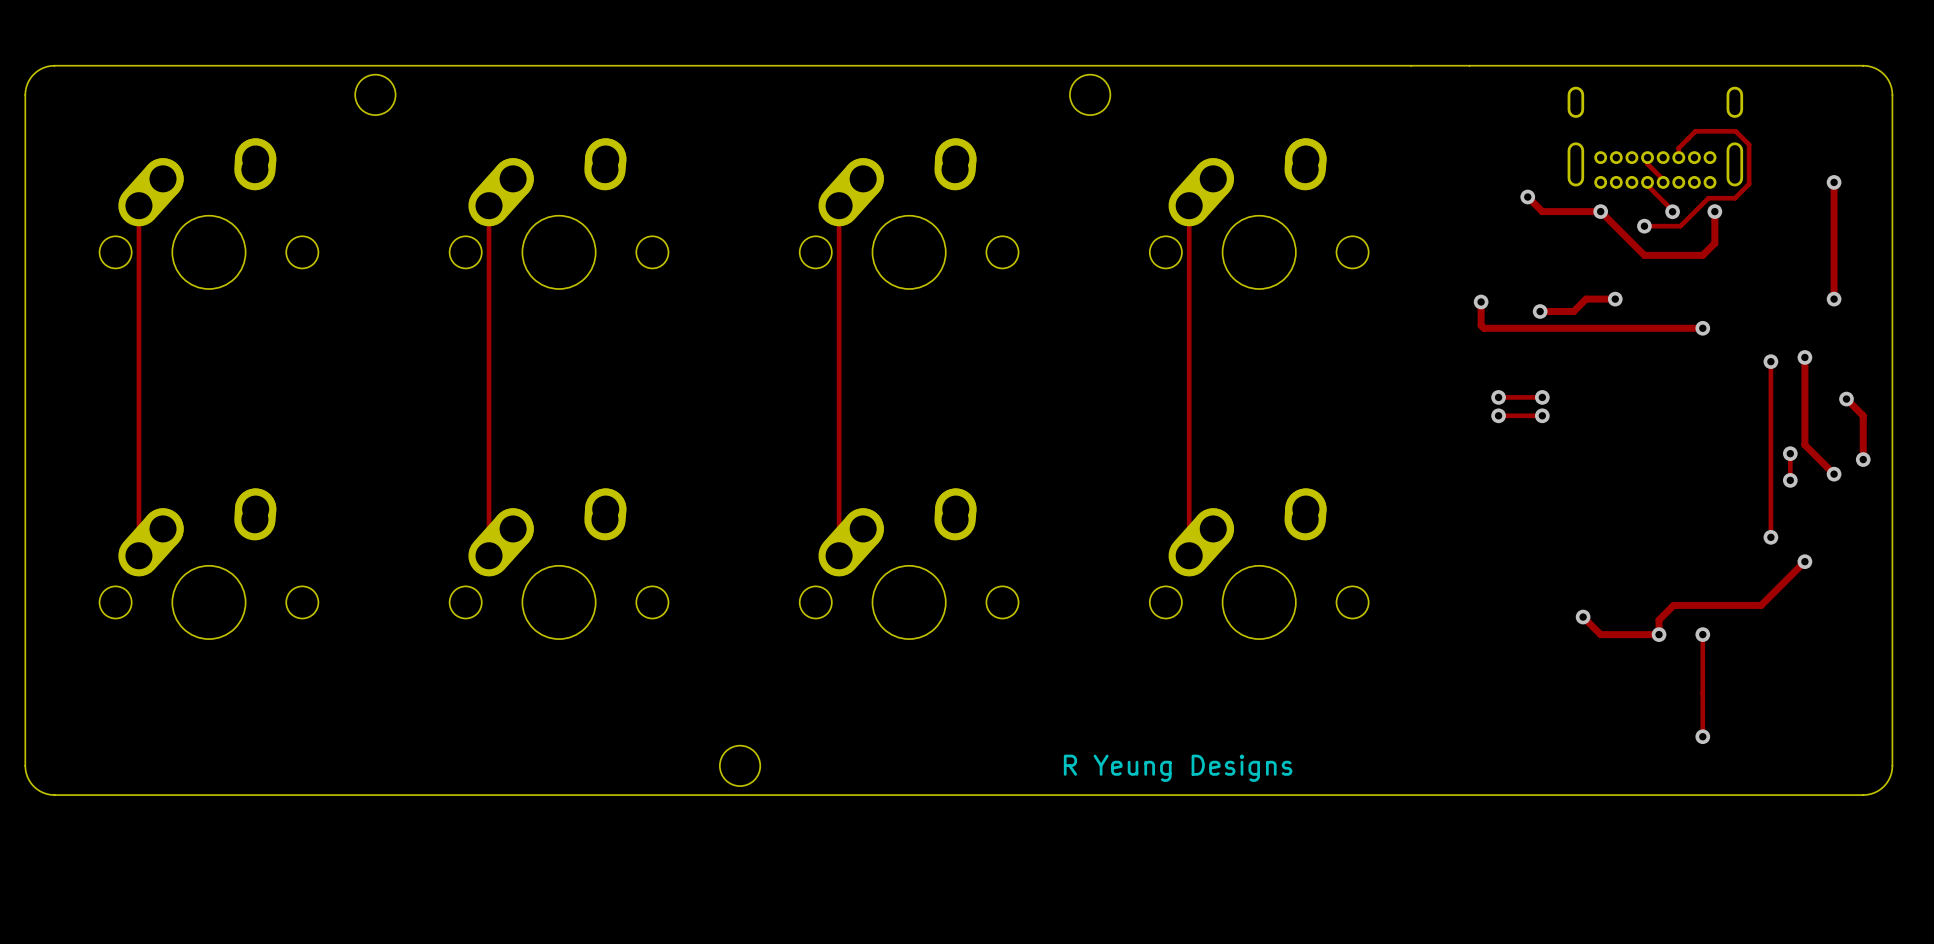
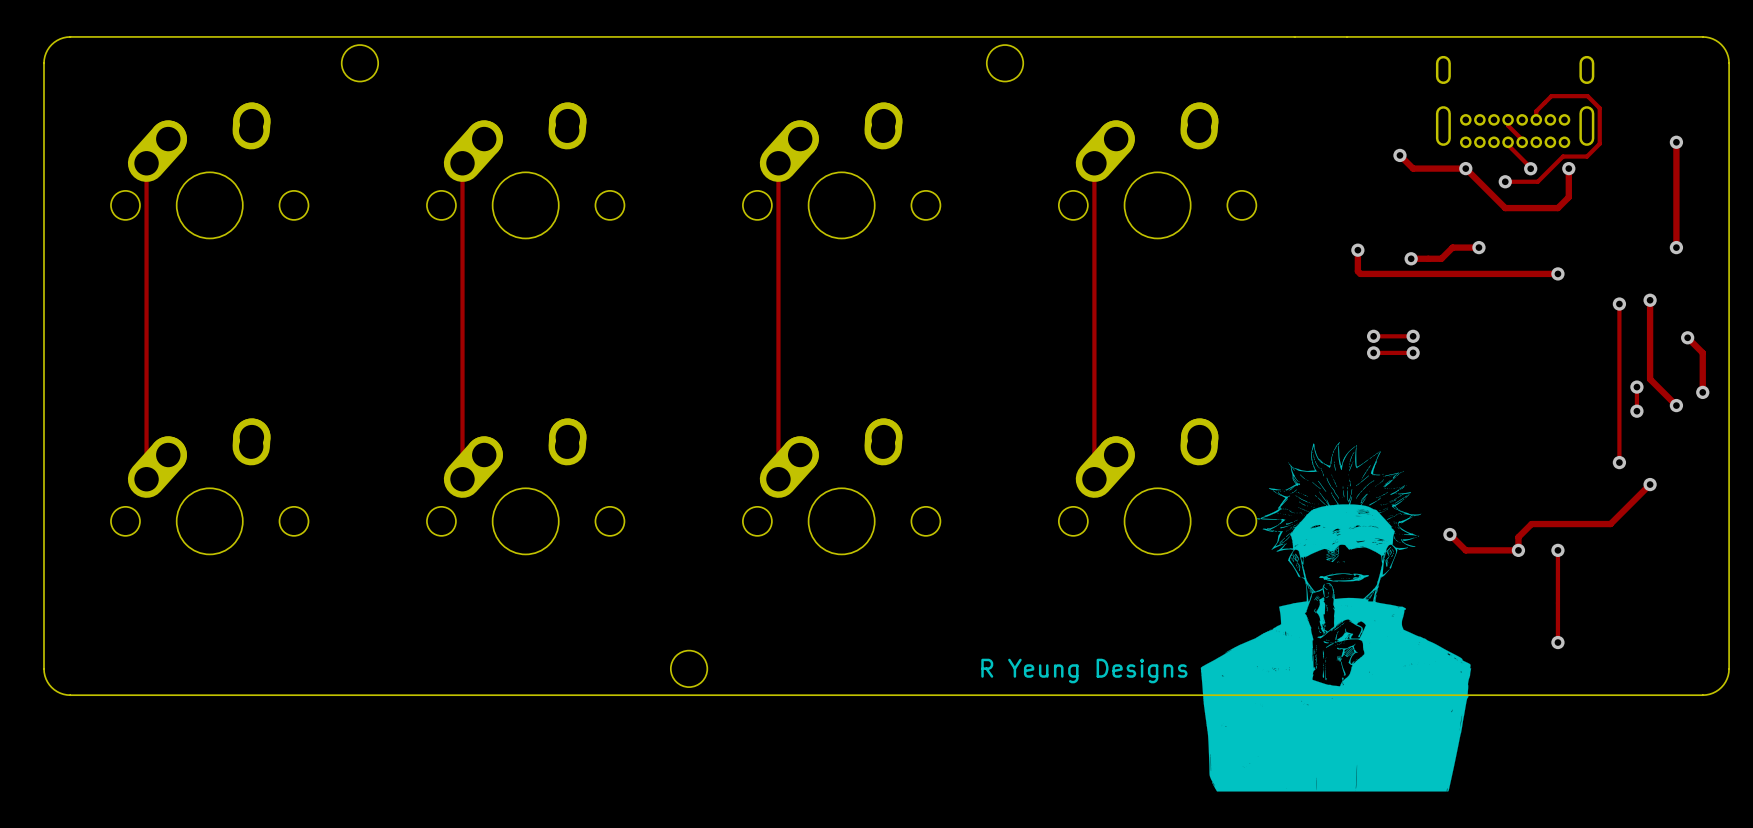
drawing: none -> [1200, 442, 1472, 792]

